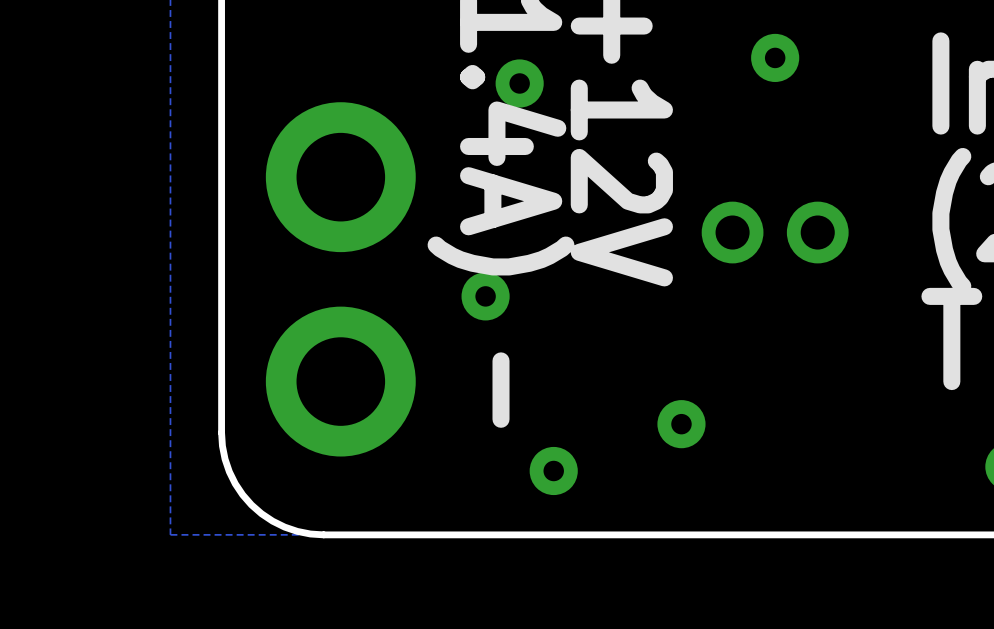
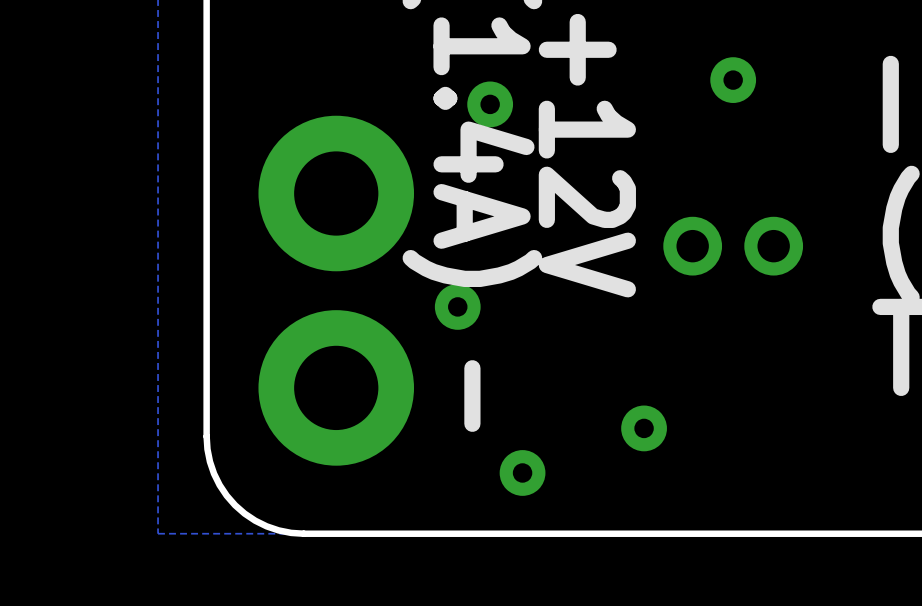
part footprint: [265, 102, 416, 457] -> [258, 115, 415, 466]

